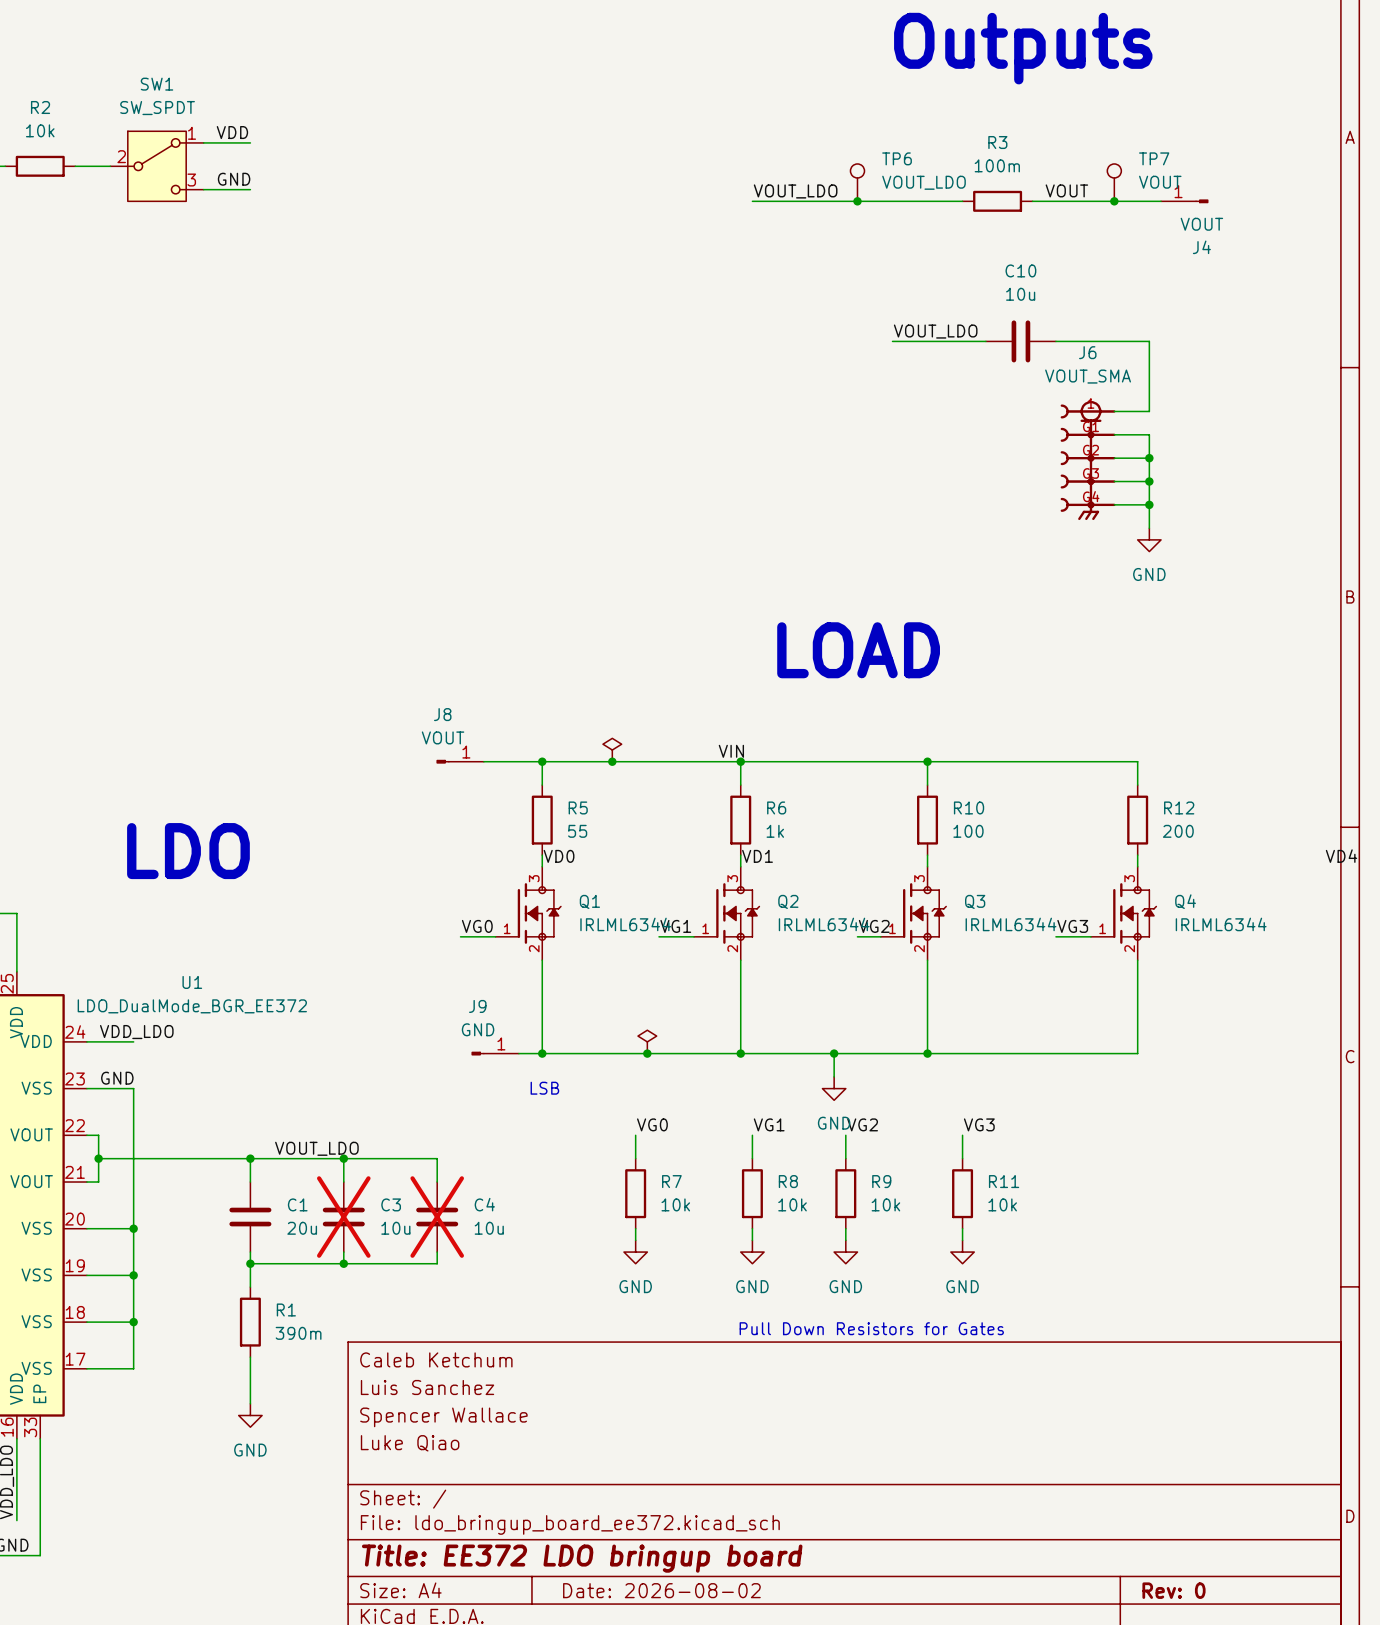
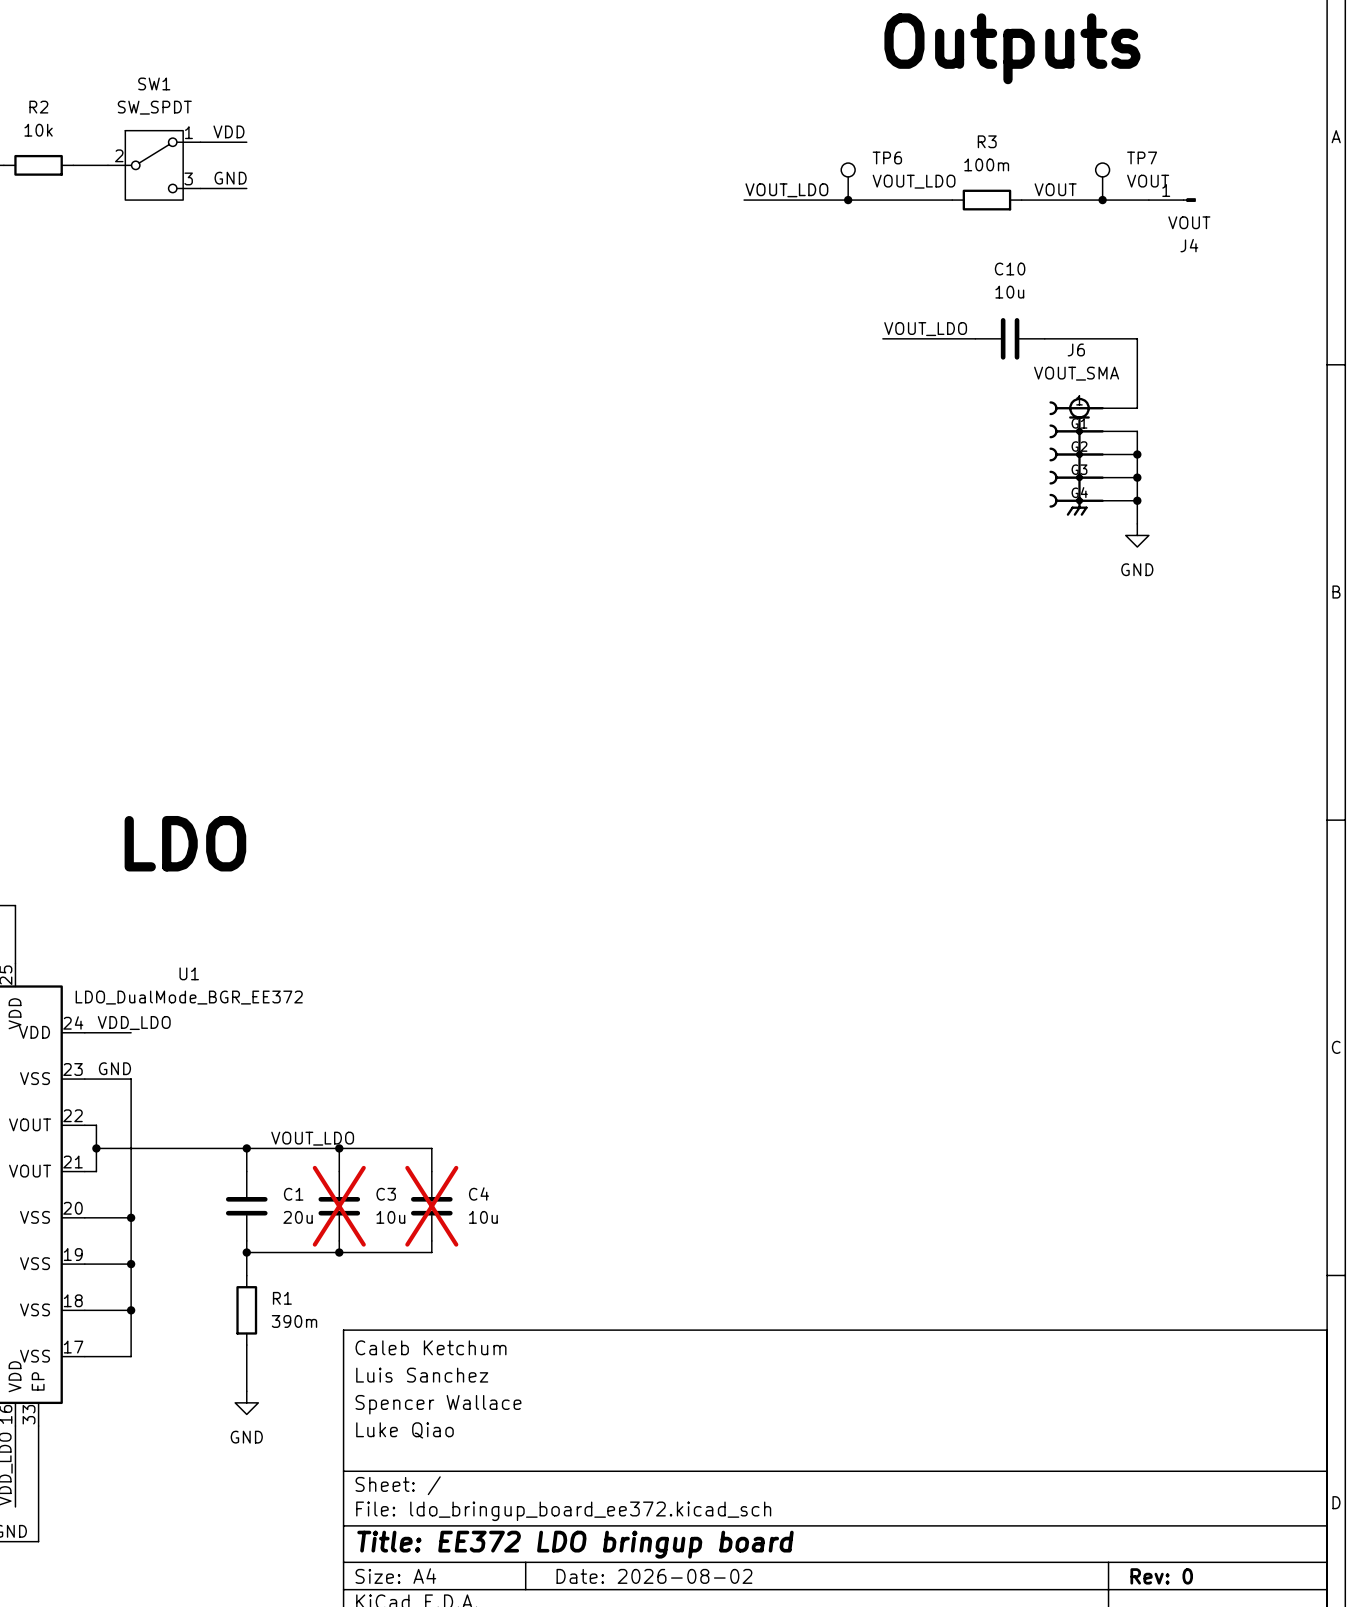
text: LOAD (858, 650) -> none
power symbol: (612, 750) -> none
label: VIN (731, 751) -> none
J8: VOUT (460, 761) -> none
wire: (483, 761) (1137, 761) (1137, 785) -> none
wire: (542, 761) (542, 785) -> none
junction: (542, 761) -> none
junction: (612, 761) -> none
wire: (740, 761) (740, 785) -> none
junction: (740, 761) -> none
wire: (927, 761) (927, 785) -> none
junction: (927, 761) -> none
R5: 55 (542, 820) -> none
R6: 1k (740, 820) -> none
R10: 100 (927, 820) -> none
R12: 200 (1137, 820) -> none
wire: (542, 855) (542, 866) -> none
wire: (740, 855) (740, 866) -> none
wire: (927, 855) (927, 866) -> none
wire: (1137, 855) (1137, 866) -> none
label: VD0 (559, 856) -> none
label: VD1 (757, 856) -> none
label: VD4 (1341, 856) -> none
Q1: IRLML6344 (528, 913) -> none
Q2: IRLML6344 (727, 913) -> none
Q3: IRLML6344 (913, 913) -> none
Q4: IRLML6344 (1124, 913) -> none
label: VG0 (477, 926) -> none
label: VG1 (675, 926) -> none
label: VG2 (874, 926) -> none
label: VG3 (1072, 926) -> none
wire: (460, 936) (495, 936) -> none
wire: (659, 936) (694, 936) -> none
wire: (857, 936) (880, 936) -> none
wire: (1055, 936) (1090, 936) -> none
wire: (542, 960) (542, 1053) -> none
wire: (740, 960) (740, 1053) -> none
wire: (927, 960) (927, 1053) -> none
wire: (1137, 960) (1137, 1053) (518, 1053) -> none
power symbol: (647, 1041) -> none
J9: GND (495, 1053) -> none
junction: (542, 1053) -> none
junction: (647, 1053) -> none
junction: (740, 1053) -> none
wire: (834, 1053) (834, 1076) -> none
junction: (834, 1053) -> none
junction: (927, 1053) -> none
text: LSB (544, 1088) -> none
power symbol: GND (834, 1088) -> none
label: VG0 (652, 1124) -> none
label: VG1 (769, 1124) -> none
label: VG2 (862, 1124) -> none
label: VG3 (979, 1124) -> none
wire: (635, 1135) (635, 1158) -> none
wire: (752, 1135) (752, 1158) -> none
wire: (845, 1135) (845, 1158) -> none
wire: (962, 1135) (962, 1158) -> none
R7: 10k (635, 1193) -> none
R8: 10k (752, 1193) -> none
R9: 10k (845, 1193) -> none
R11: 10k (962, 1193) -> none
wire: (635, 1228) (635, 1240) -> none
wire: (752, 1228) (752, 1240) -> none
wire: (845, 1228) (845, 1240) -> none
wire: (962, 1228) (962, 1240) -> none
power symbol: GND (635, 1252) -> none
power symbol: GND (752, 1252) -> none
power symbol: GND (845, 1252) -> none
power symbol: GND (962, 1252) -> none
text: Pull Down Resistors for Gates (871, 1328) -> none

